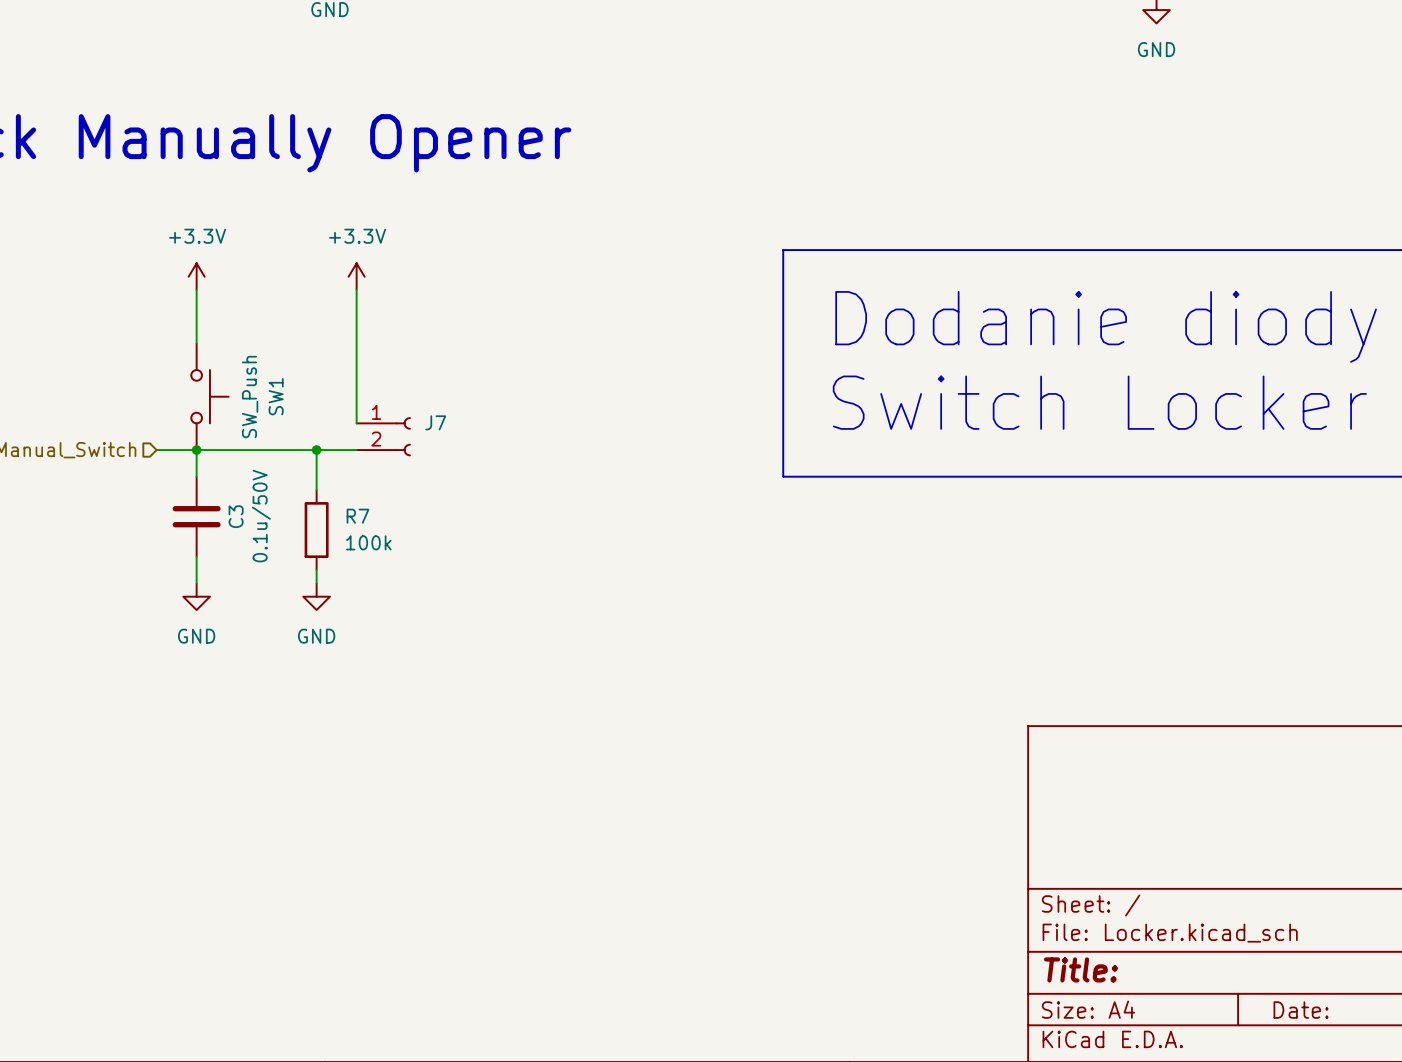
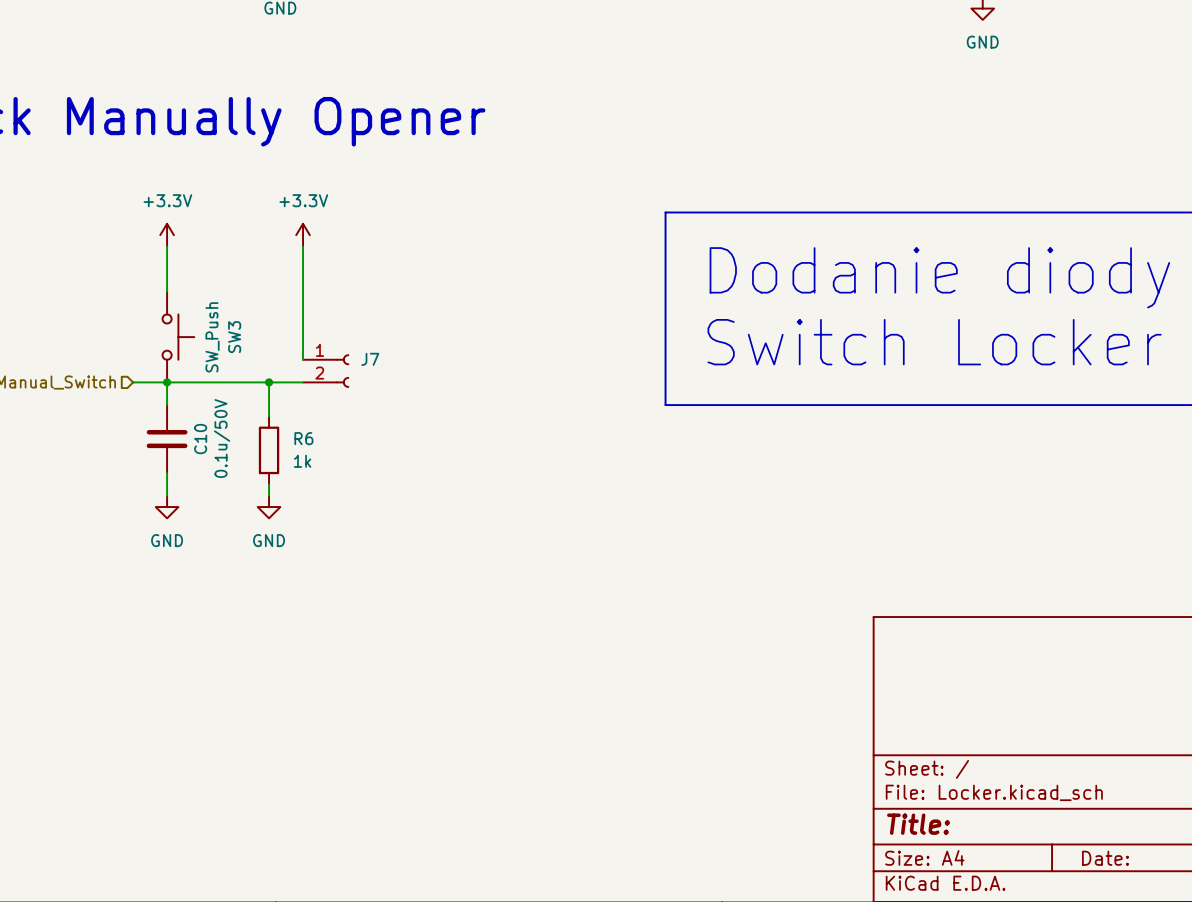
SW1 name: SW1 (276, 396) -> SW3 (234, 337)
C3 name: C3 (236, 516) -> C10 (200, 439)
R7 name: R7 (357, 516) -> R6 (303, 438)
R7 value: 100k (368, 542) -> 1k (302, 461)

